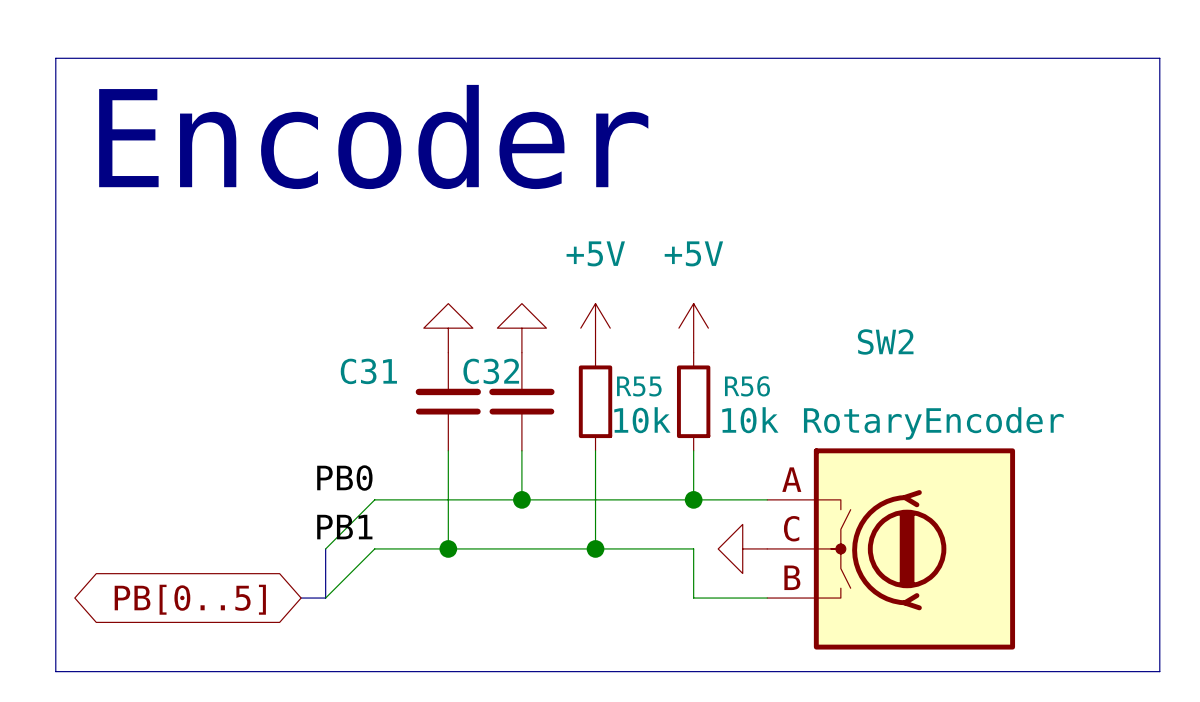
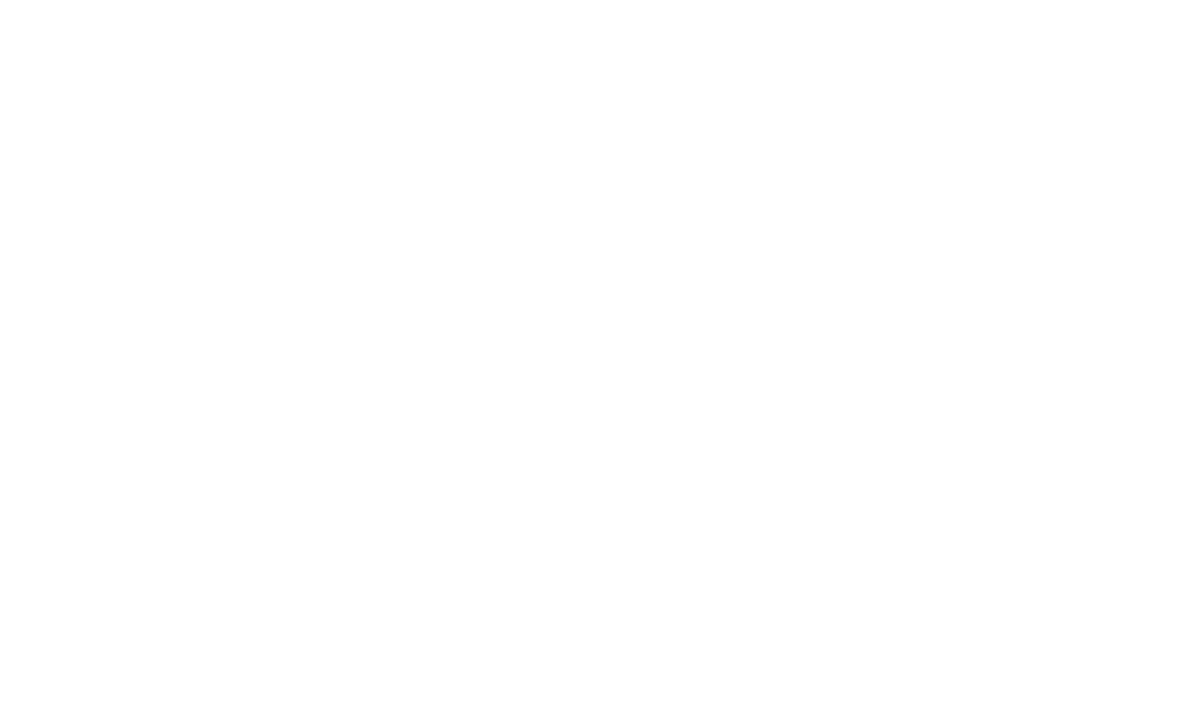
line: (55, 58) (1159, 58) (1159, 671) (55, 671) (55, 58) -> none
text: Encoder (373, 137) -> none
power symbol: (448, 328) -> none
power symbol: (521, 328) -> none
power symbol: +5V (595, 328) -> none
power symbol: +5V (693, 328) -> none
C31: (448, 401) -> none
C32: (521, 401) -> none
R55: 10k (595, 401) -> none
R56: 10k (693, 401) -> none
wire: (448, 450) (448, 548) -> none
wire: (521, 450) (521, 499) -> none
wire: (595, 450) (595, 548) -> none
wire: (693, 450) (693, 499) -> none
label: PB0 (344, 478) -> none
junction: (521, 499) -> none
junction: (693, 499) -> none
wire: (767, 499) (374, 499) (325, 548) -> none
label: PB1 (344, 527) -> none
bus: (325, 548) (325, 598) (301, 598) -> none
junction: (448, 548) -> none
junction: (595, 548) -> none
power symbol: (742, 548) -> none
SW2: RotaryEncoder (891, 548) -> none
wire: (325, 598) (374, 548) (693, 548) (693, 598) (767, 598) -> none
global label: PB[0..5] (190, 599) -> none

